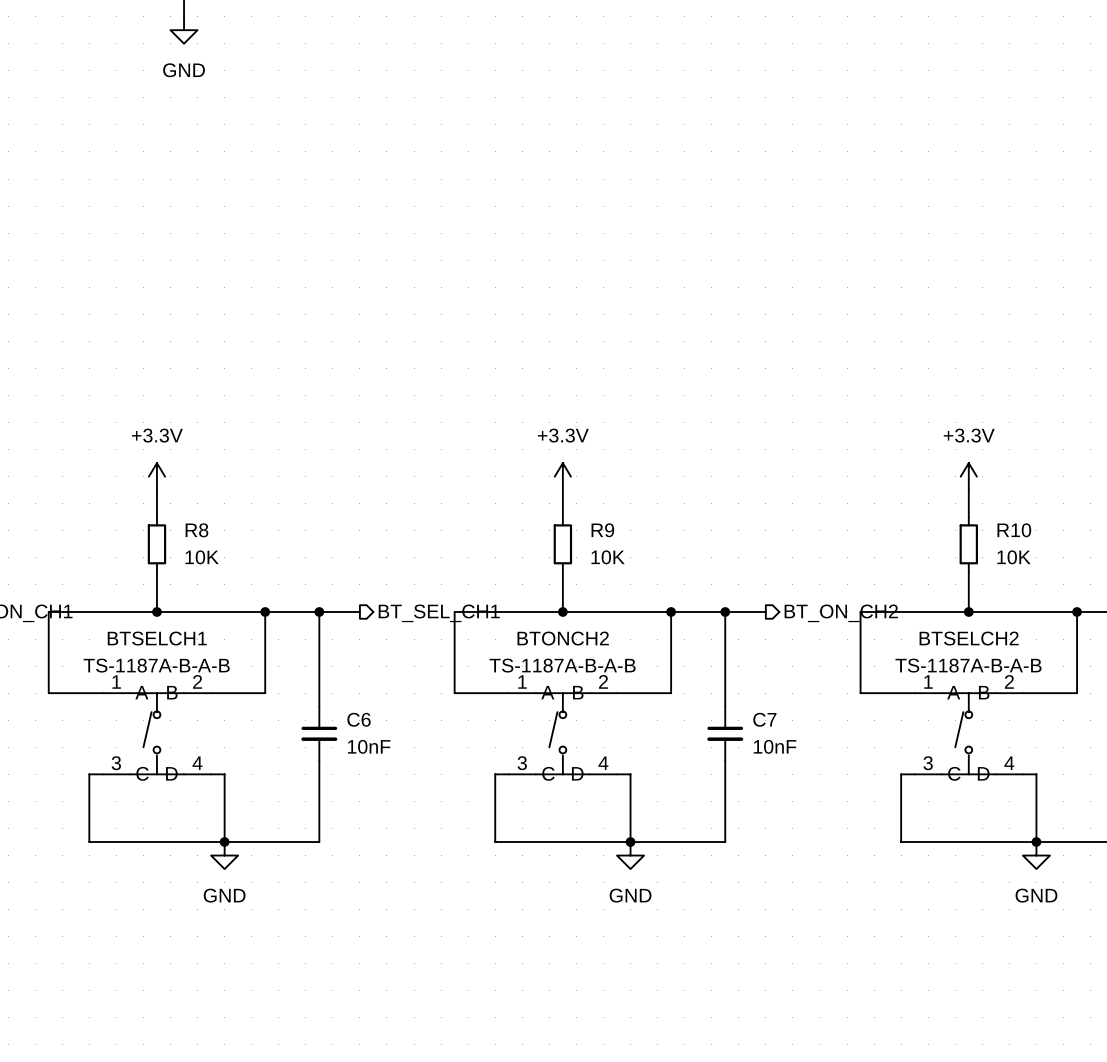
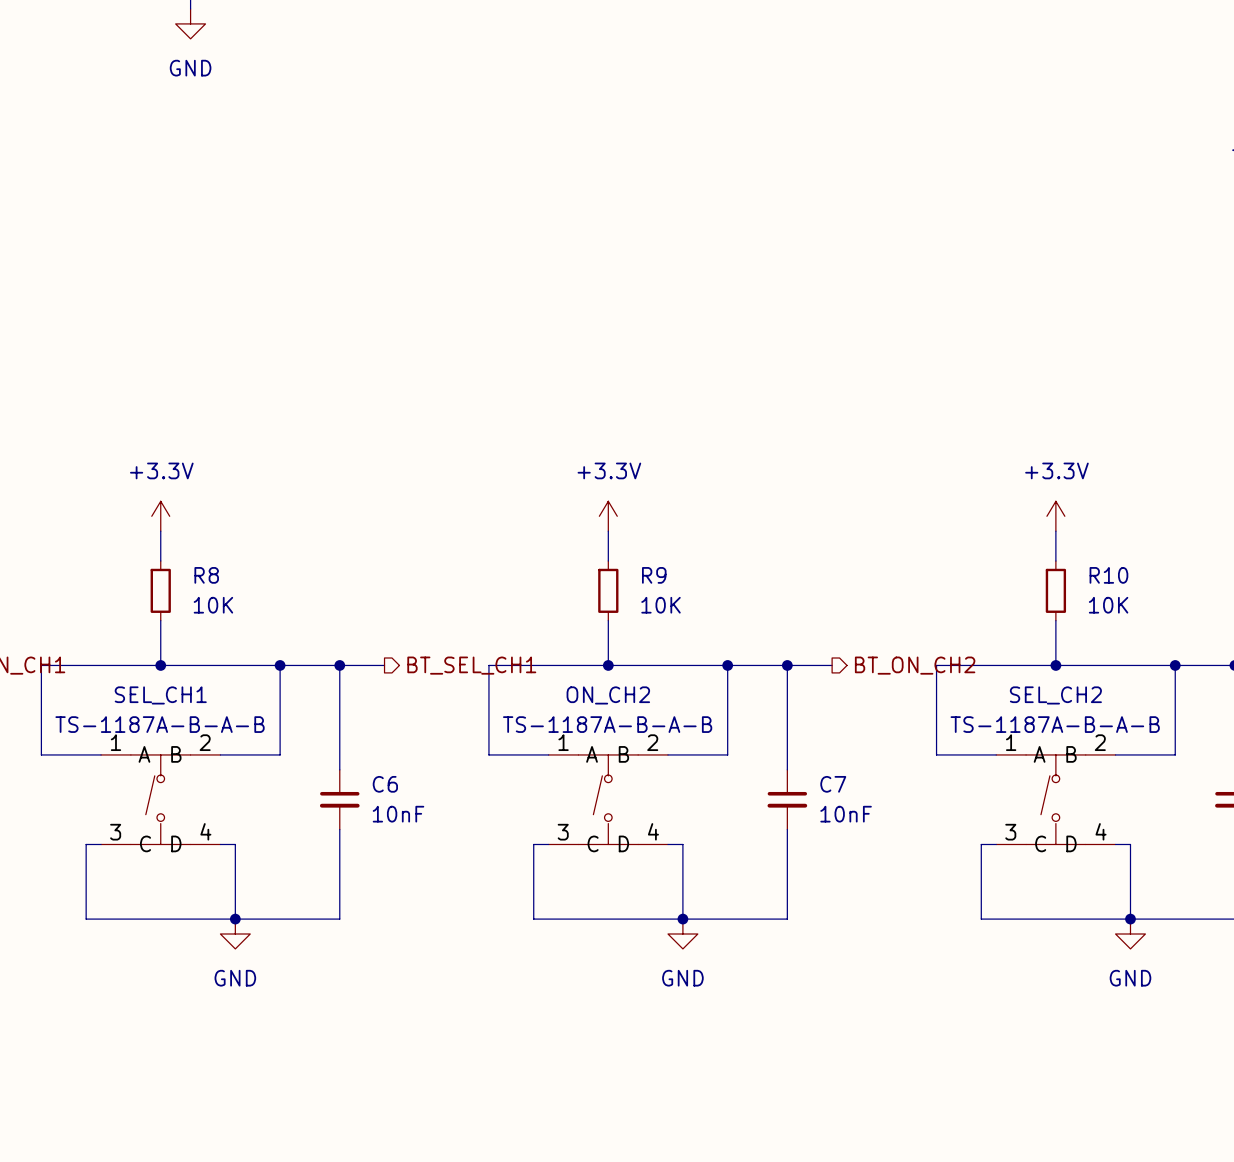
BTSELCH1 name: BTSELCH1 (157, 638) -> SEL_CH1 (160, 695)
BTONCH2 name: BTONCH2 (563, 638) -> ON_CH2 (608, 695)
BTSELCH2 name: BTSELCH2 (969, 638) -> SEL_CH2 (1055, 695)

